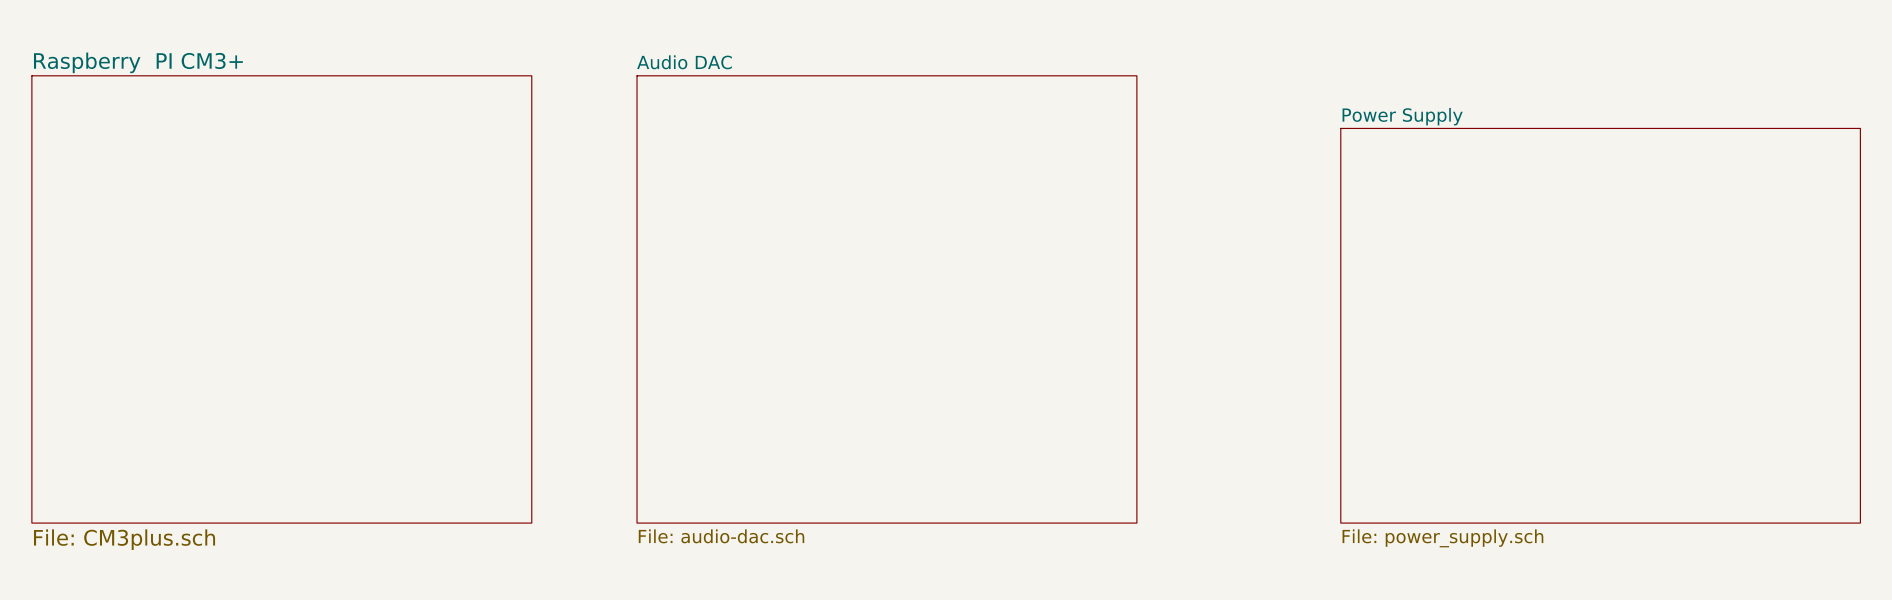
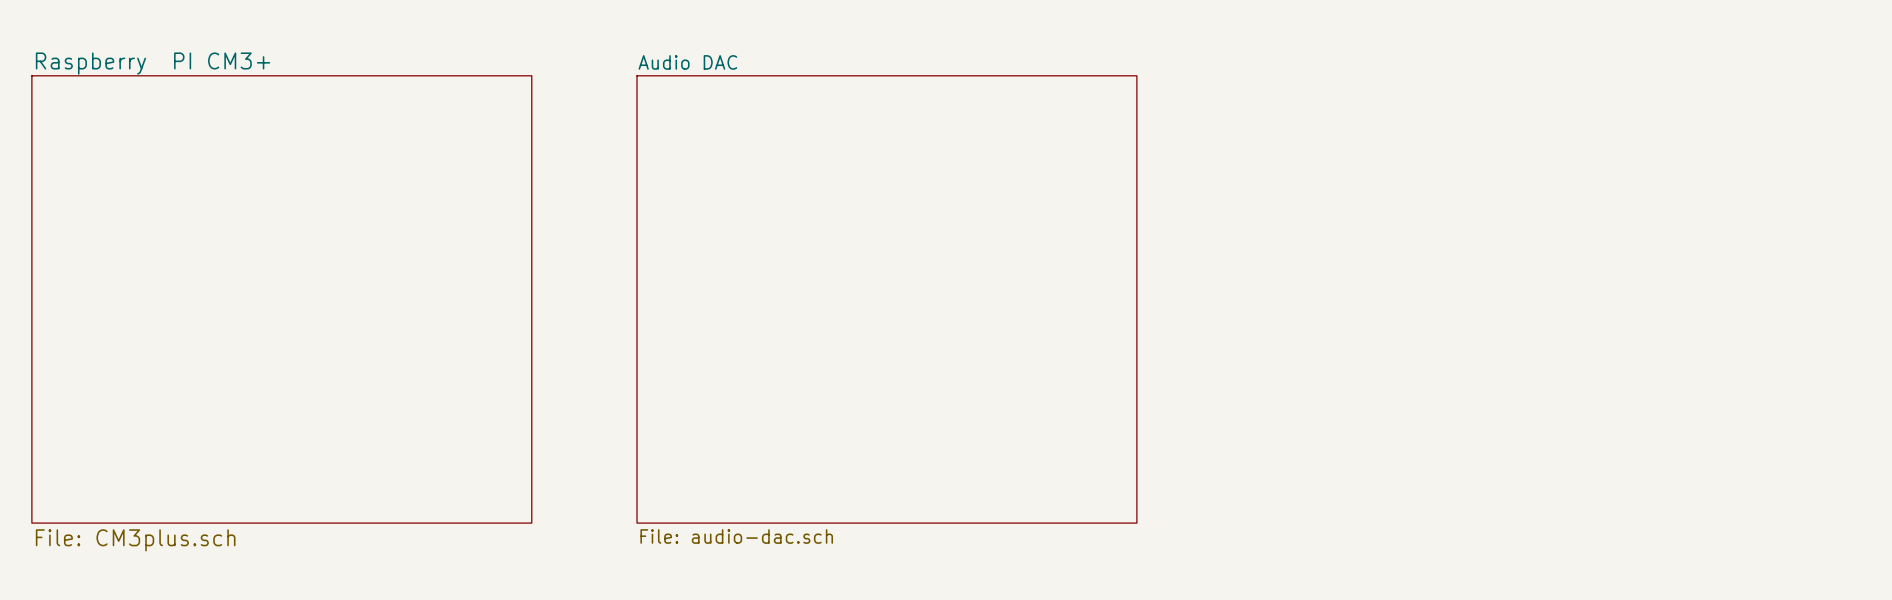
sheet Power Supply: File: power_supply.sch (1600, 325) -> none

